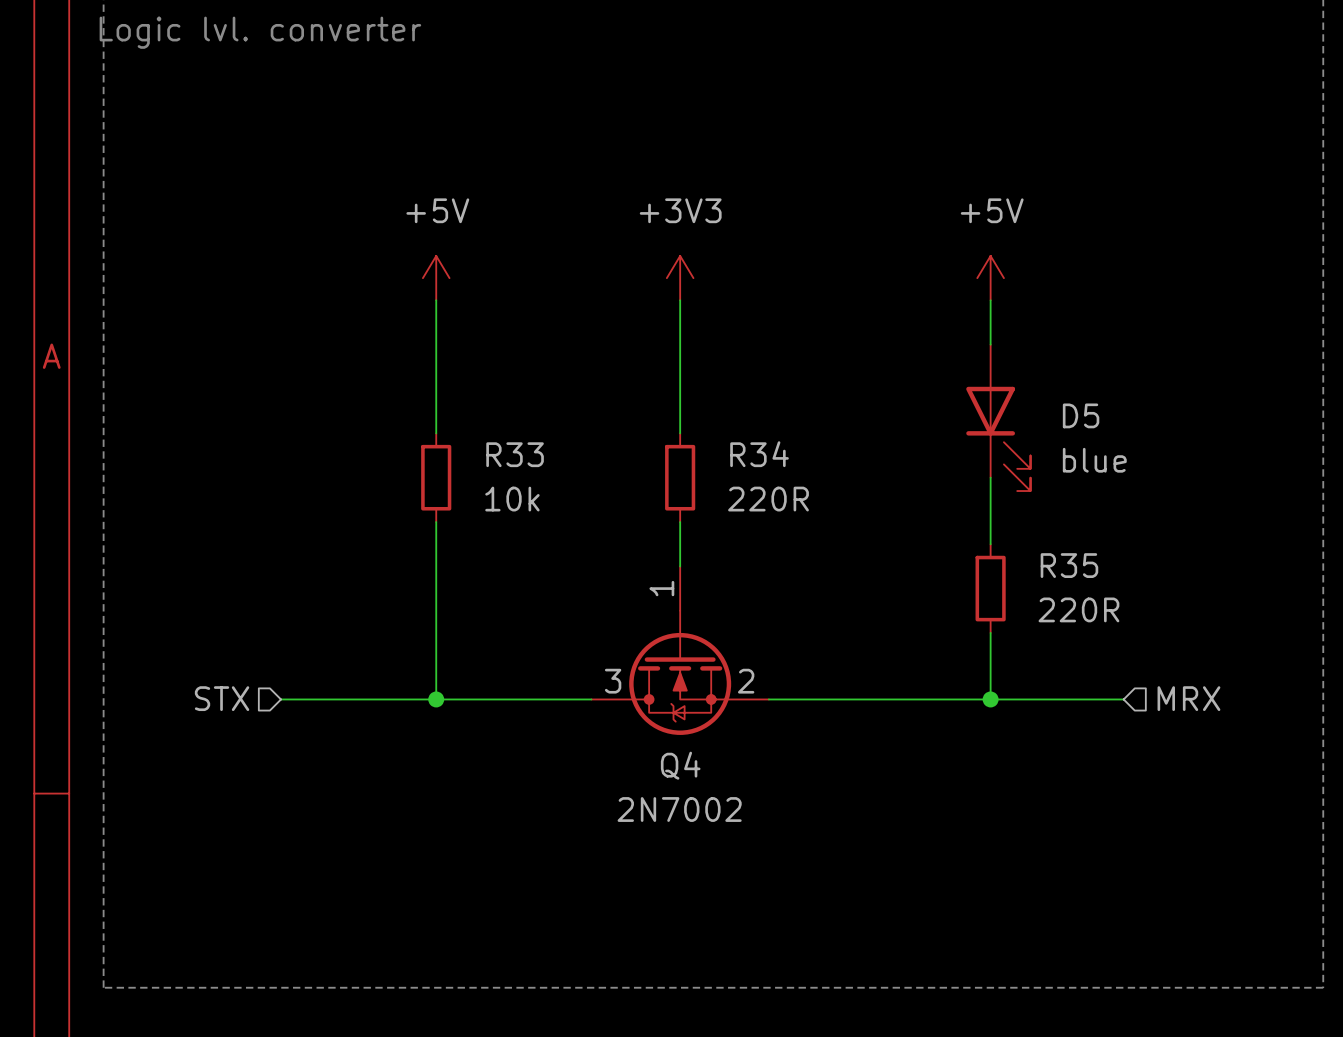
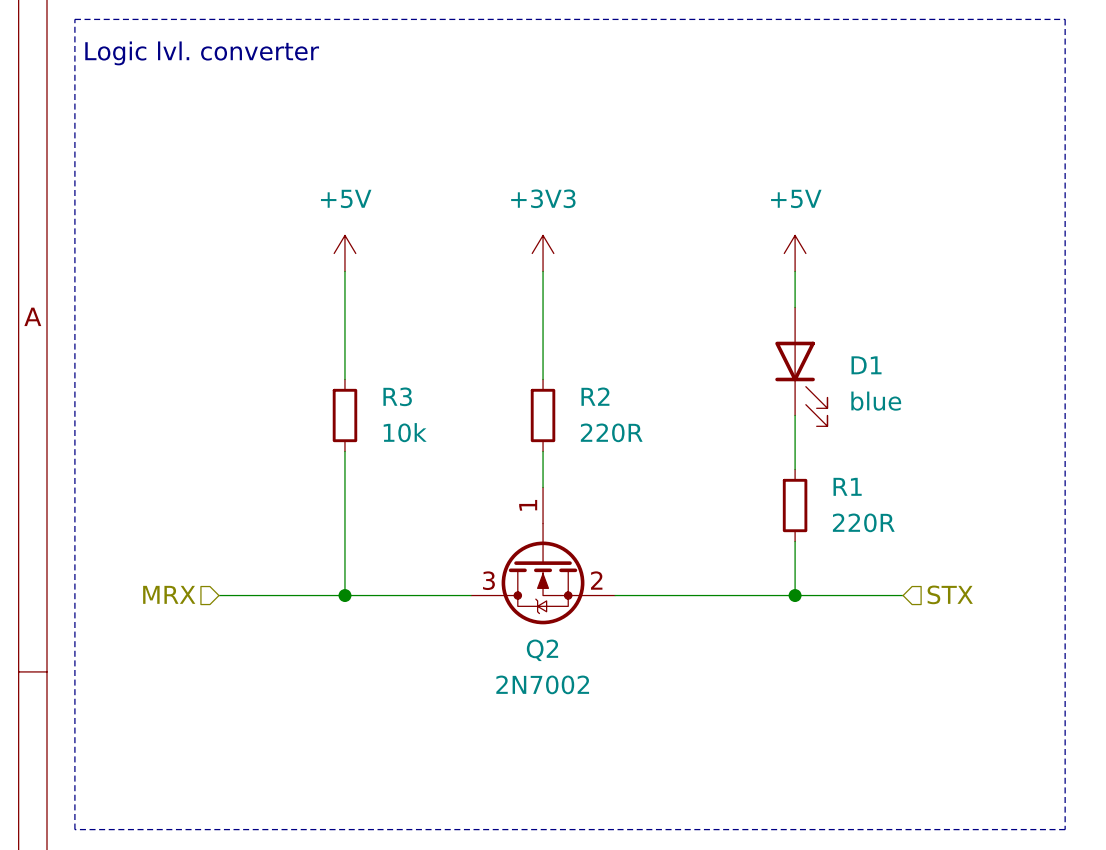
D5 name: D5 (1081, 415) -> D1 (866, 365)
R33 name: R33 (515, 454) -> R3 (397, 396)
R34 name: R34 (759, 454) -> R2 (595, 396)
R35 name: R35 (1069, 565) -> R1 (847, 486)
hierarchical label: STX (222, 698) -> MRX (169, 594)
hierarchical label: MRX (1188, 698) -> STX (950, 594)
Q4 name: Q4 (680, 765) -> Q2 (542, 650)

